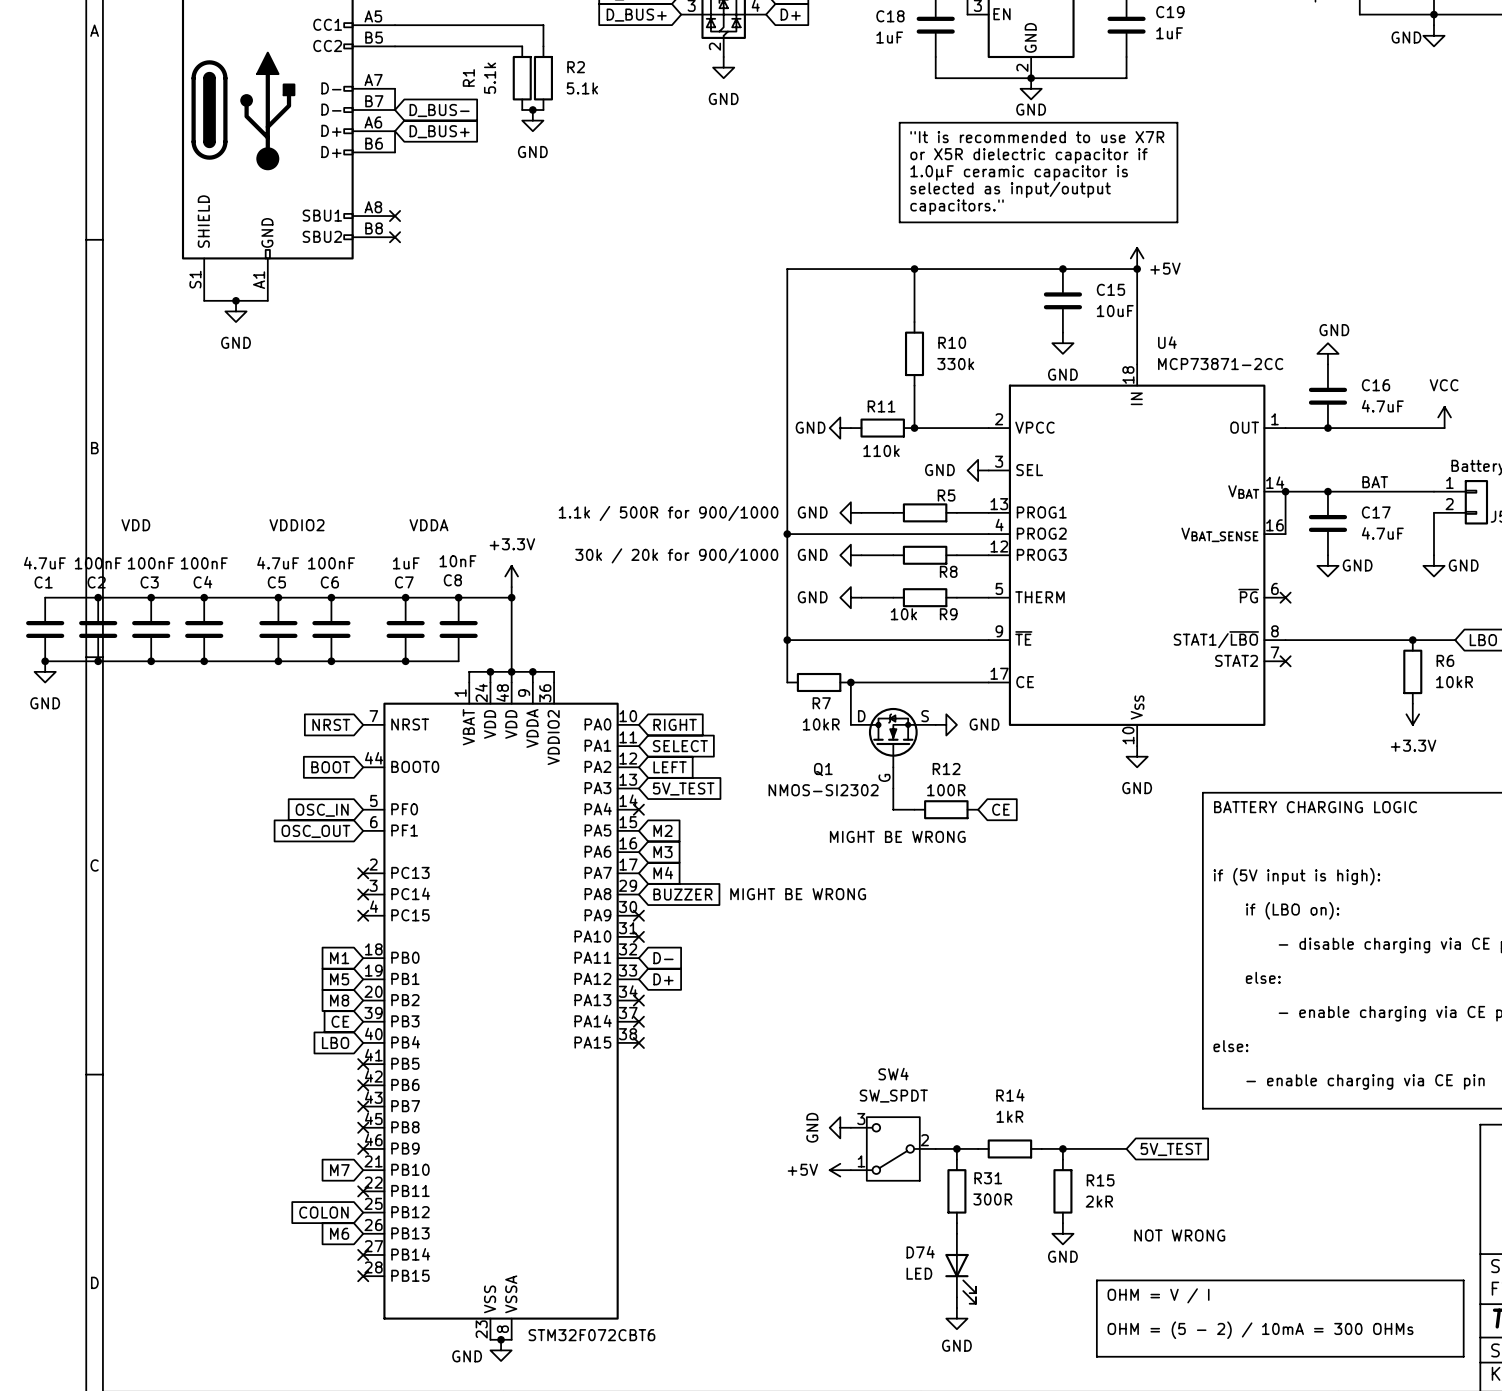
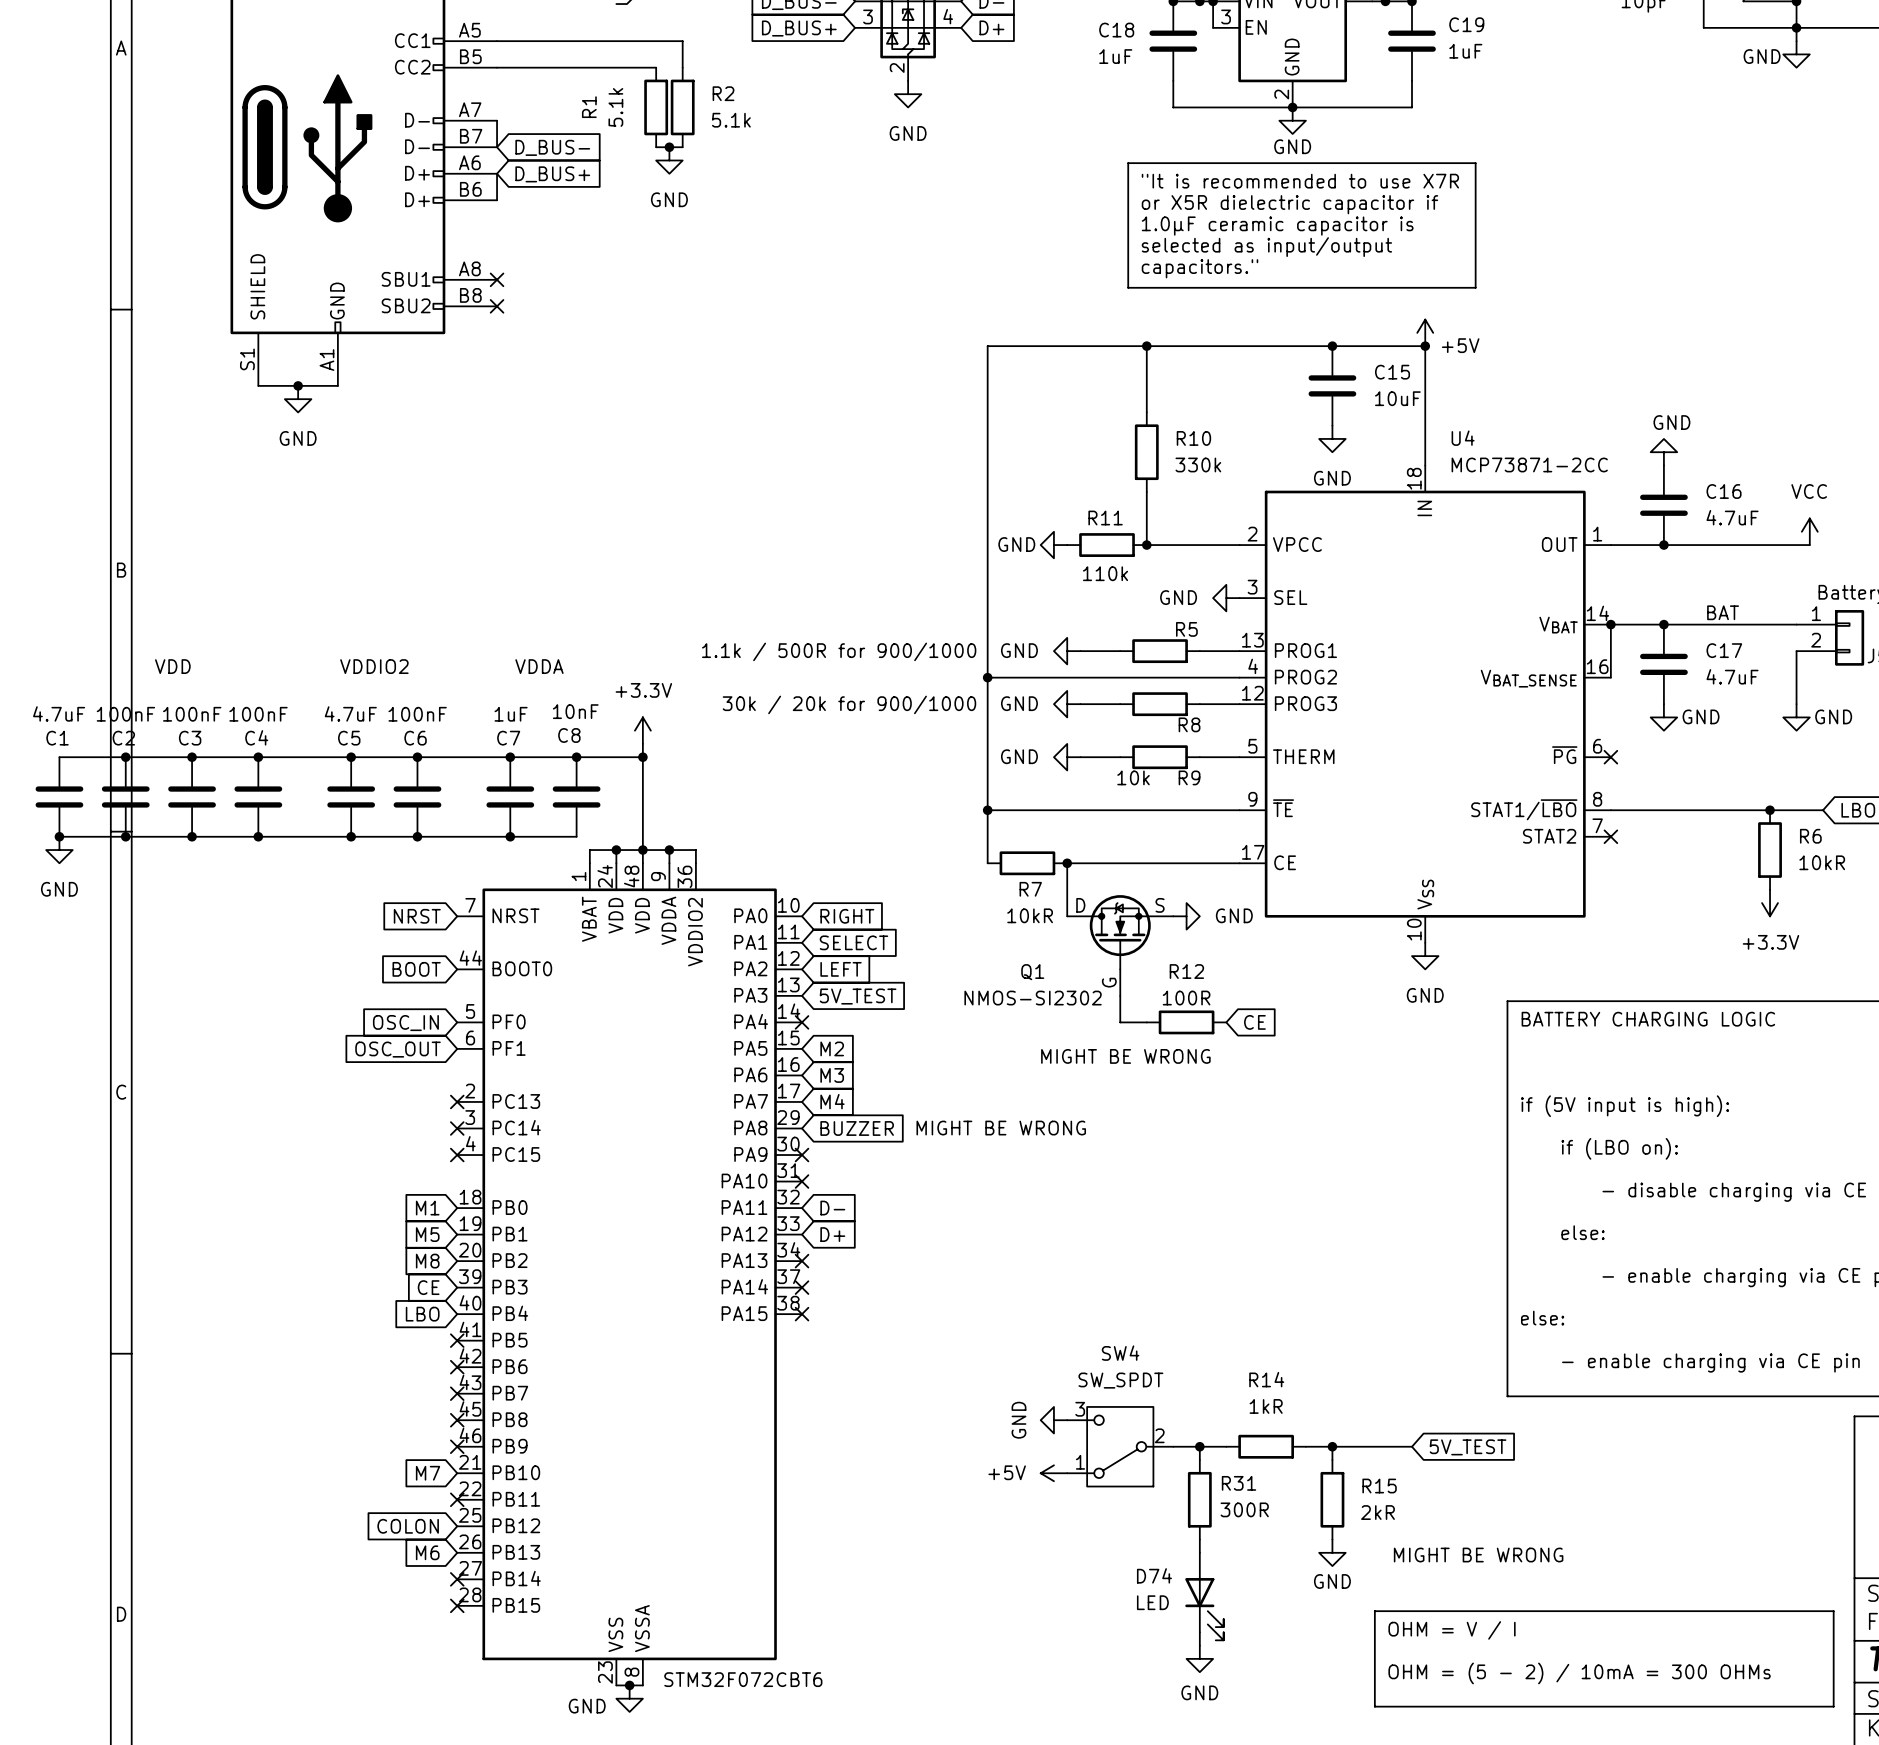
text: NOT WRONG (1179, 1235) -> MIGHT BE WRONG (1478, 1555)

